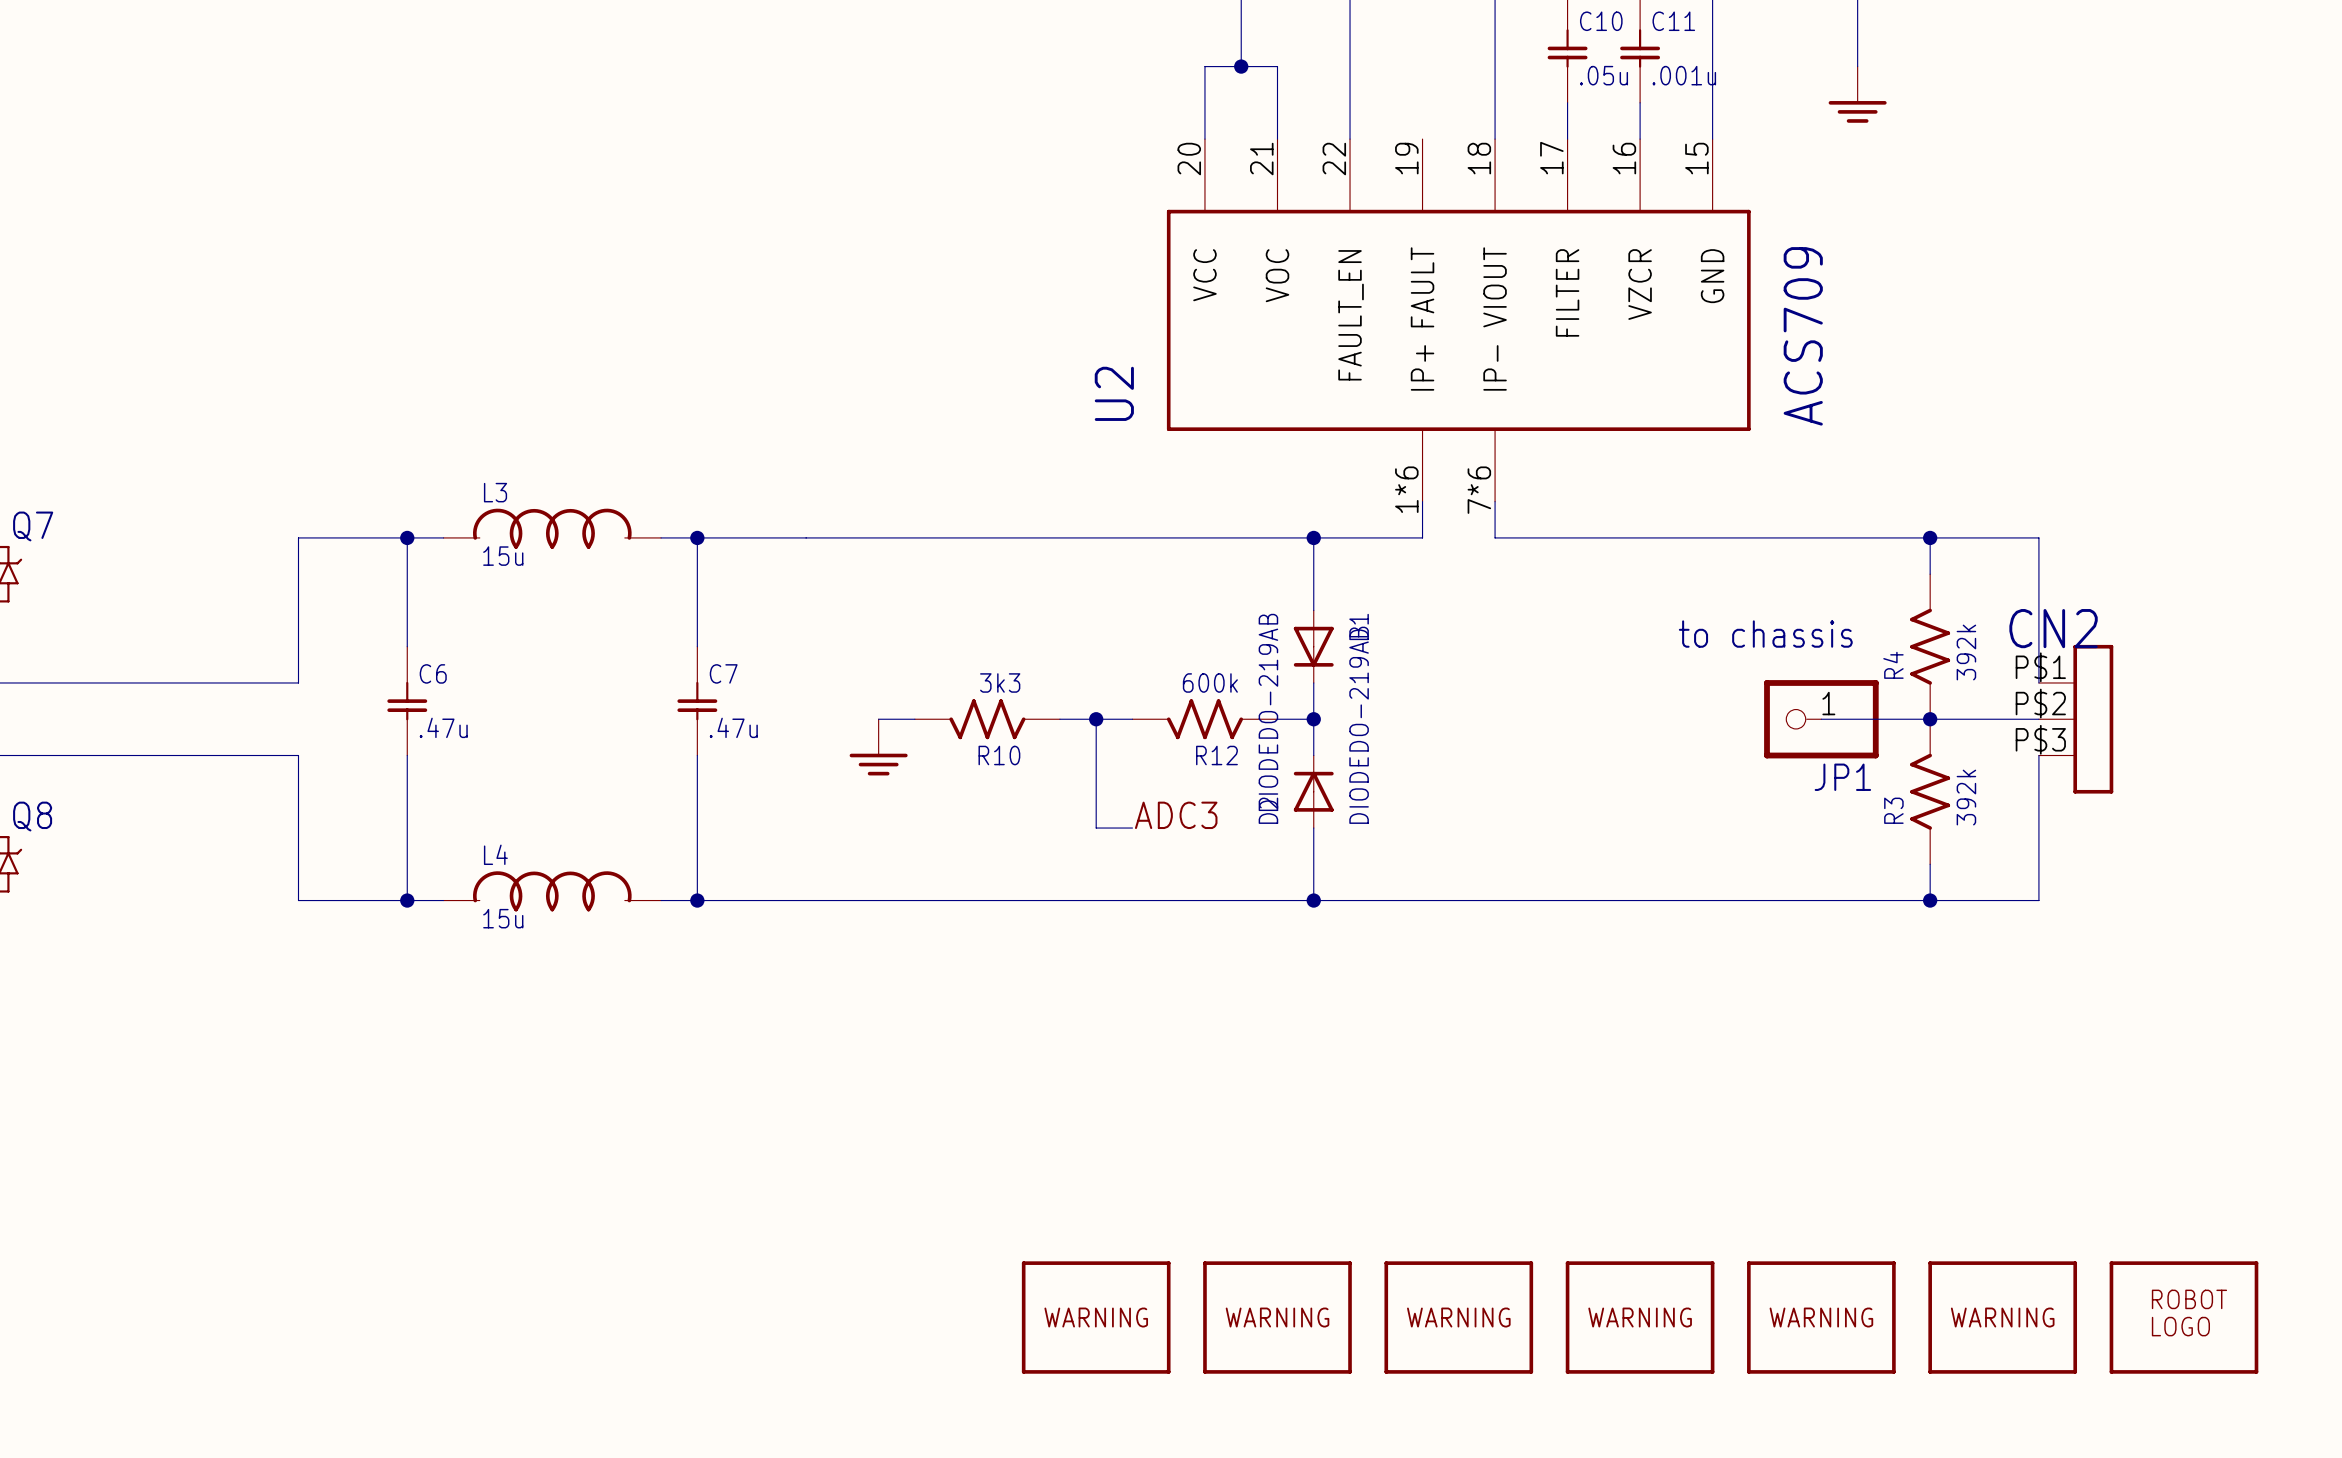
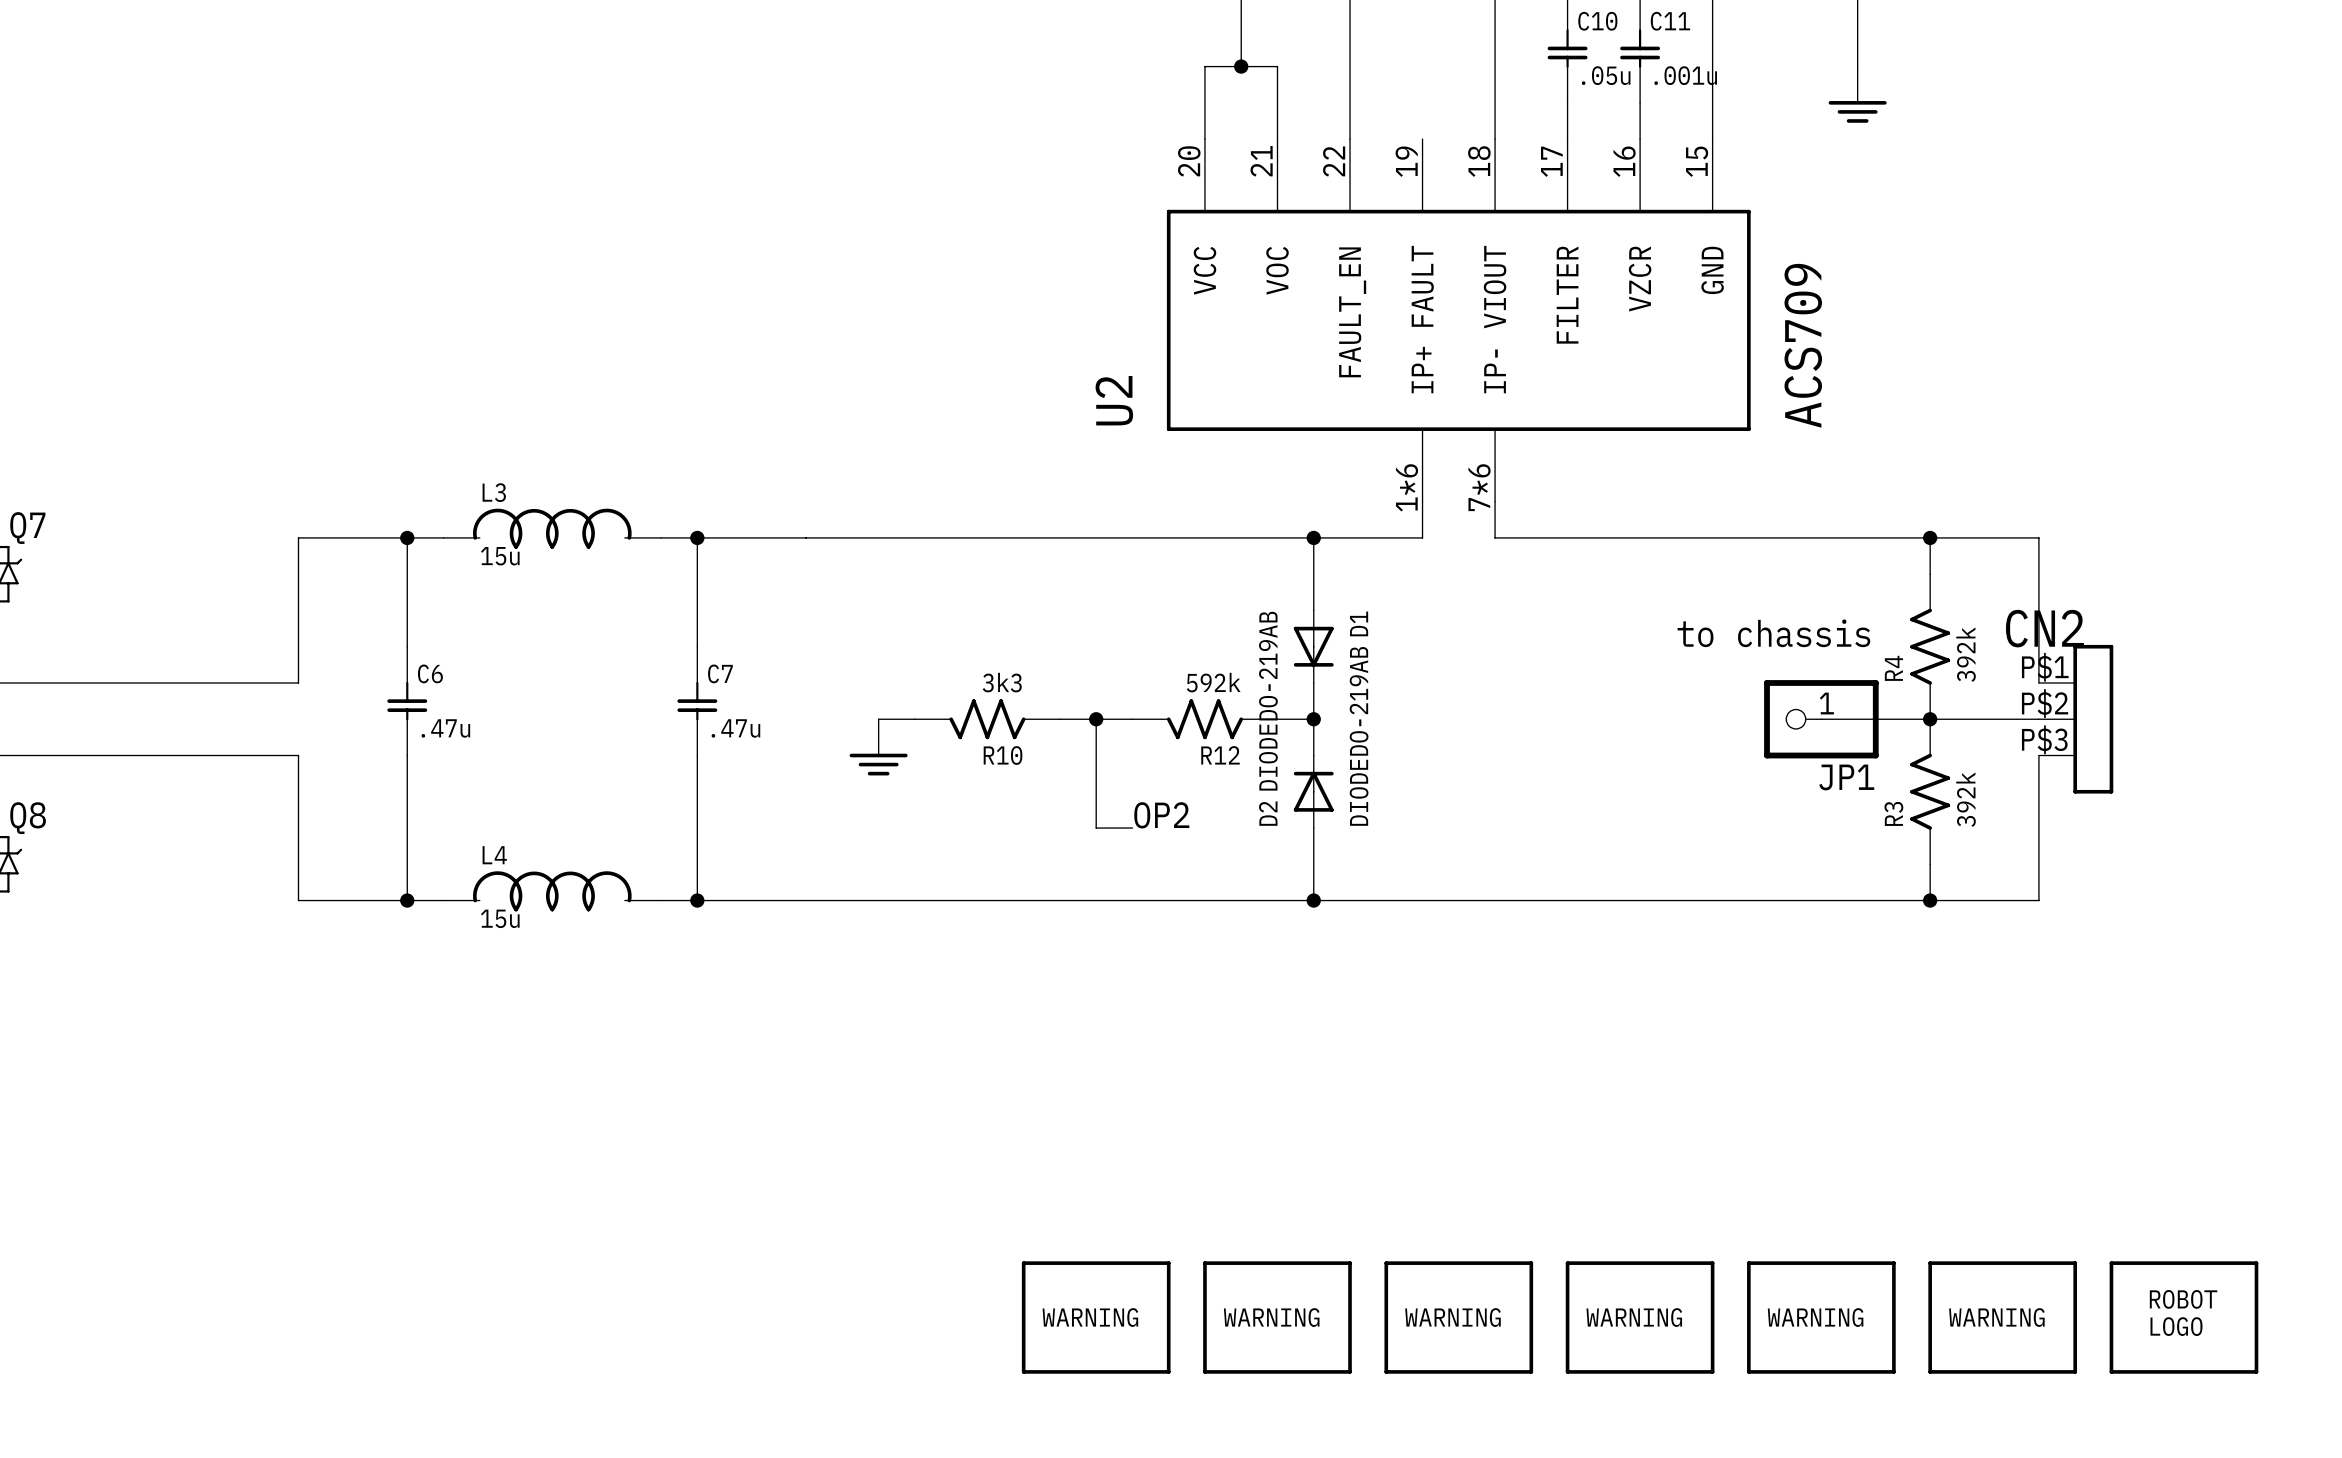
R12 value: 600k (1210, 682) -> 592k (1213, 682)
label: ADC3 (1176, 815) -> OP2 (1161, 815)

